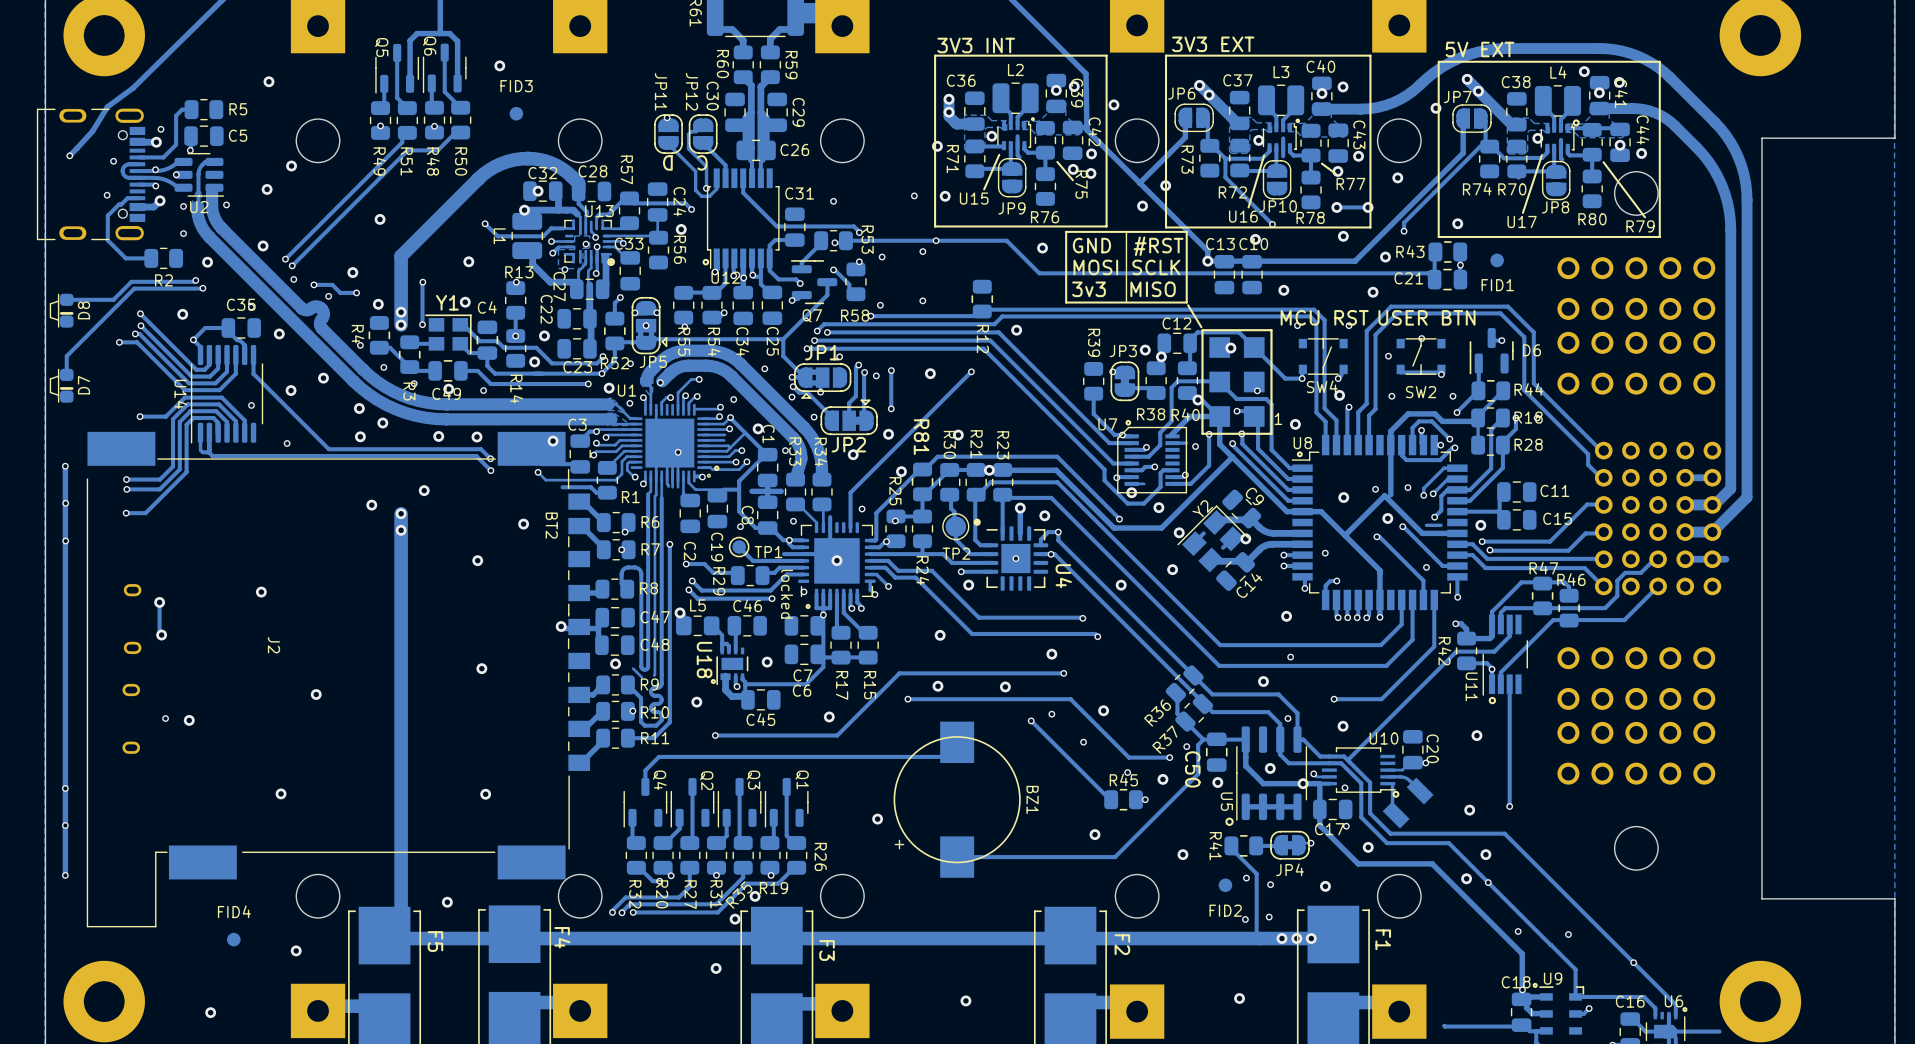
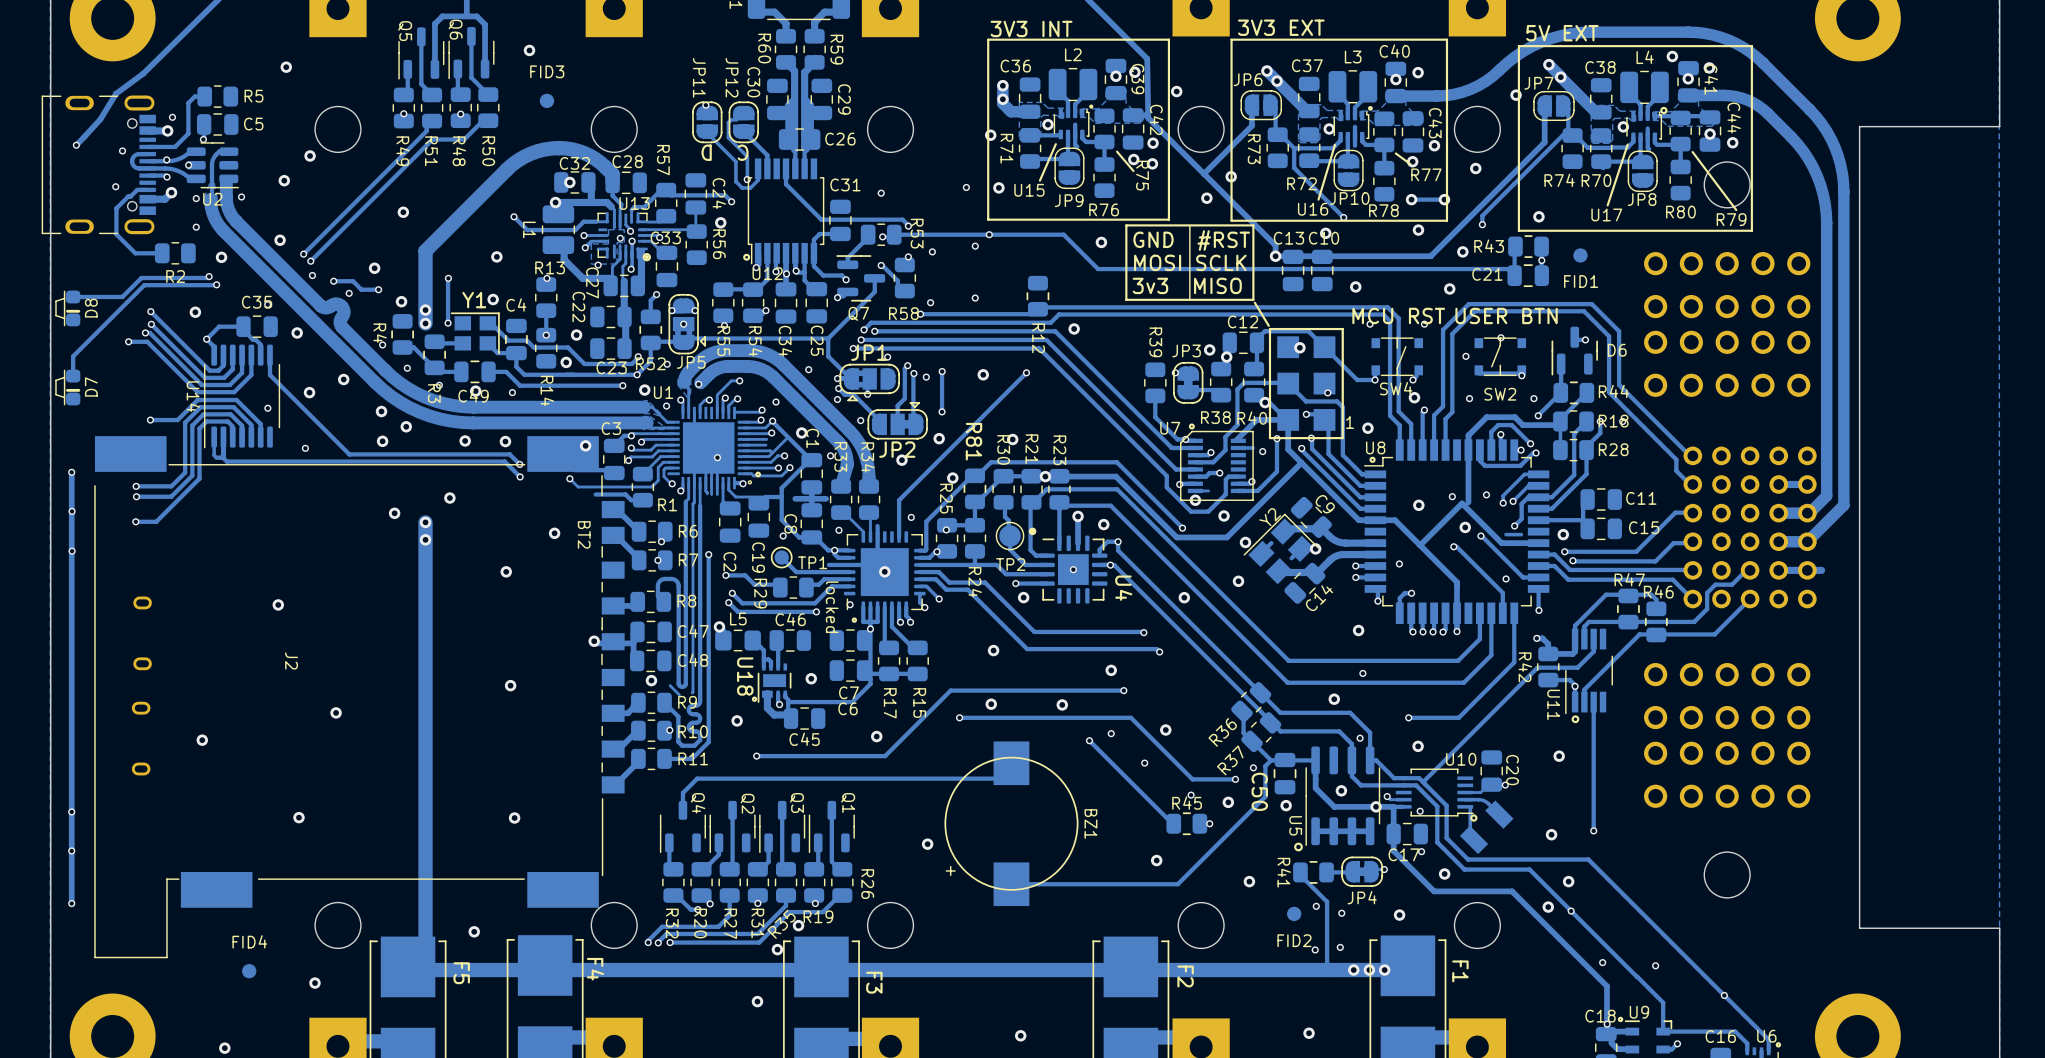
track: (159, 602) (159, 632) (161, 635) -> none
via: (159, 602) -> none
via: (161, 635) -> none
via: (165, 718) -> none

